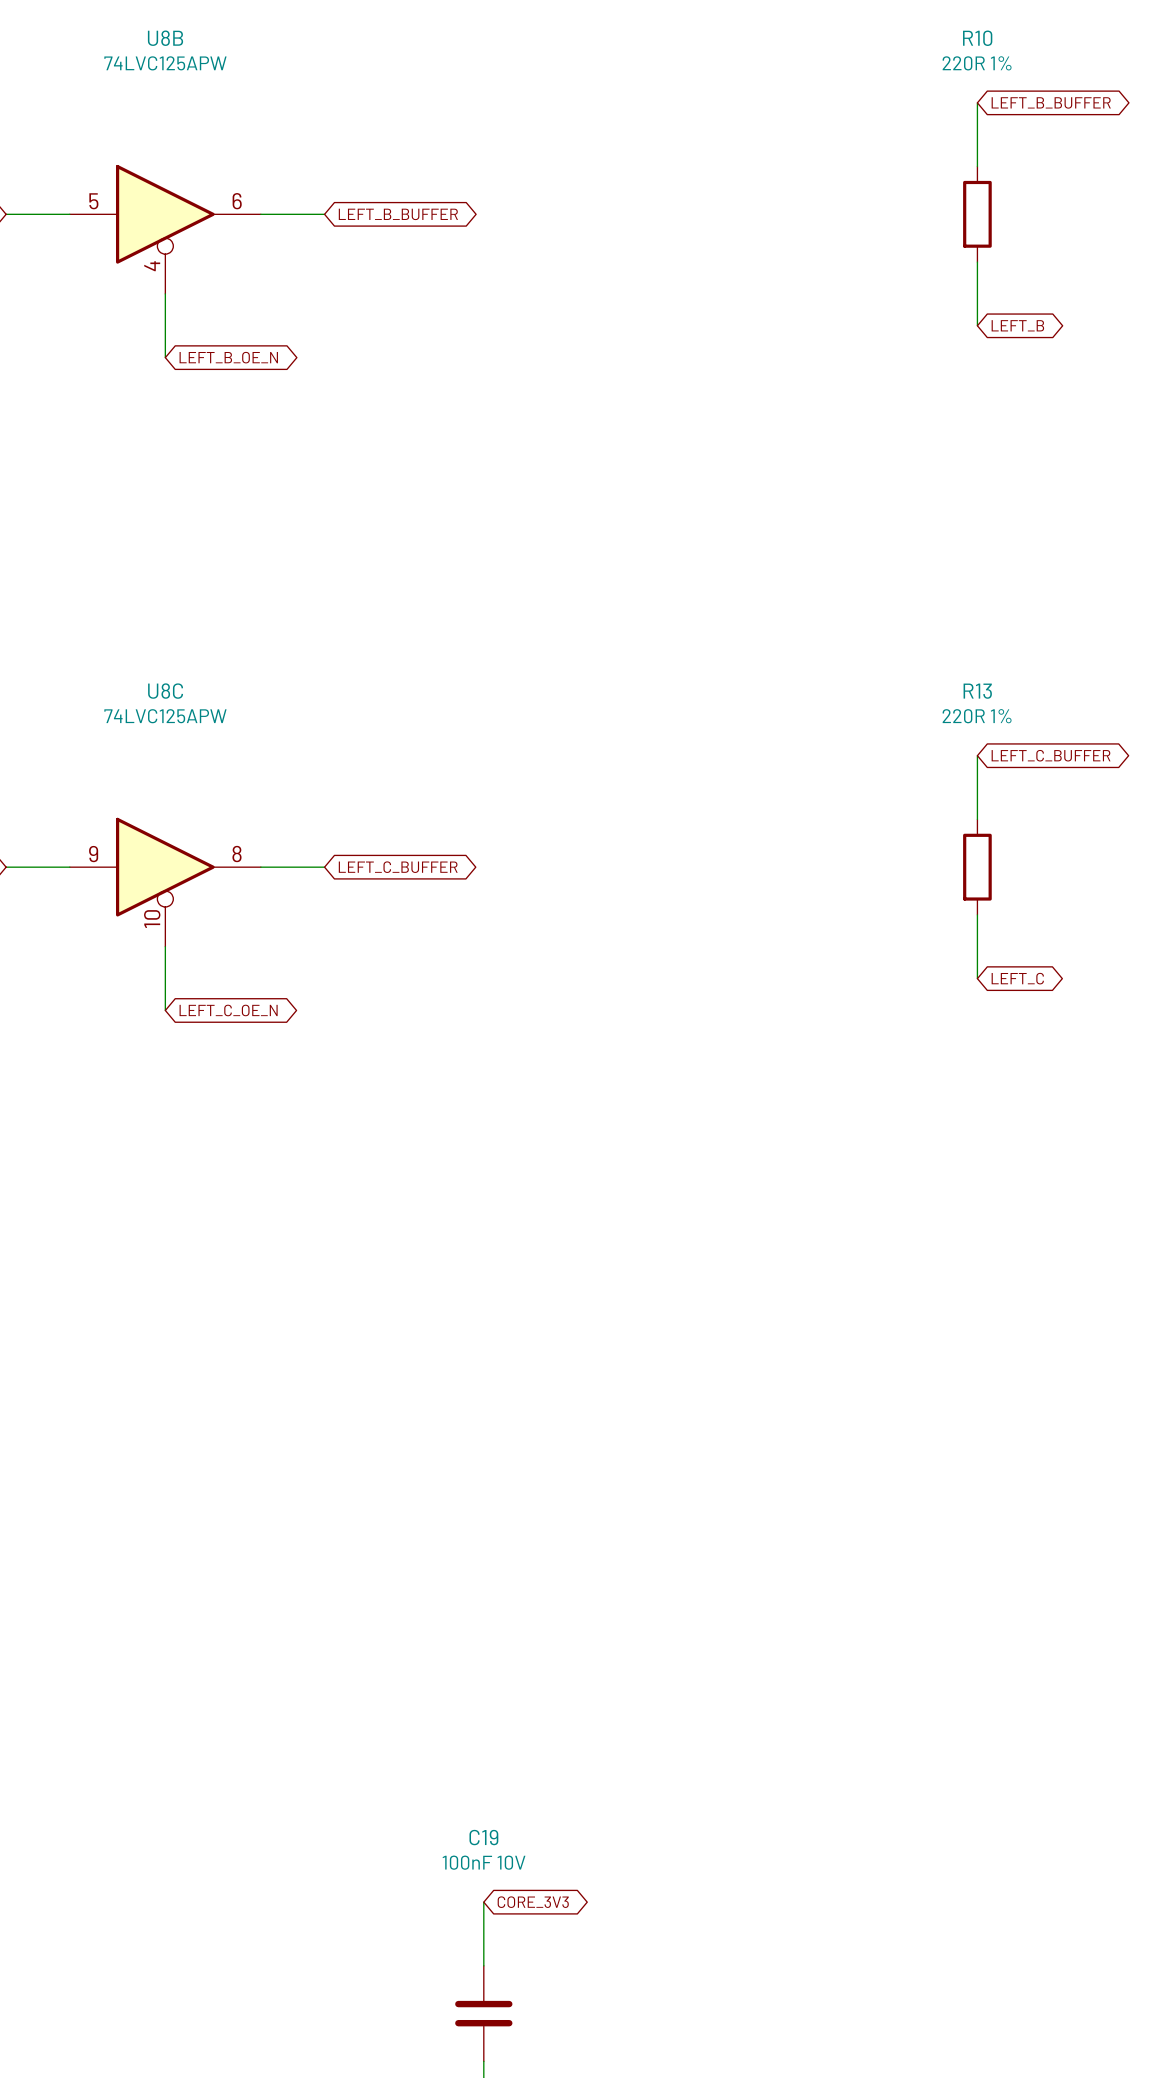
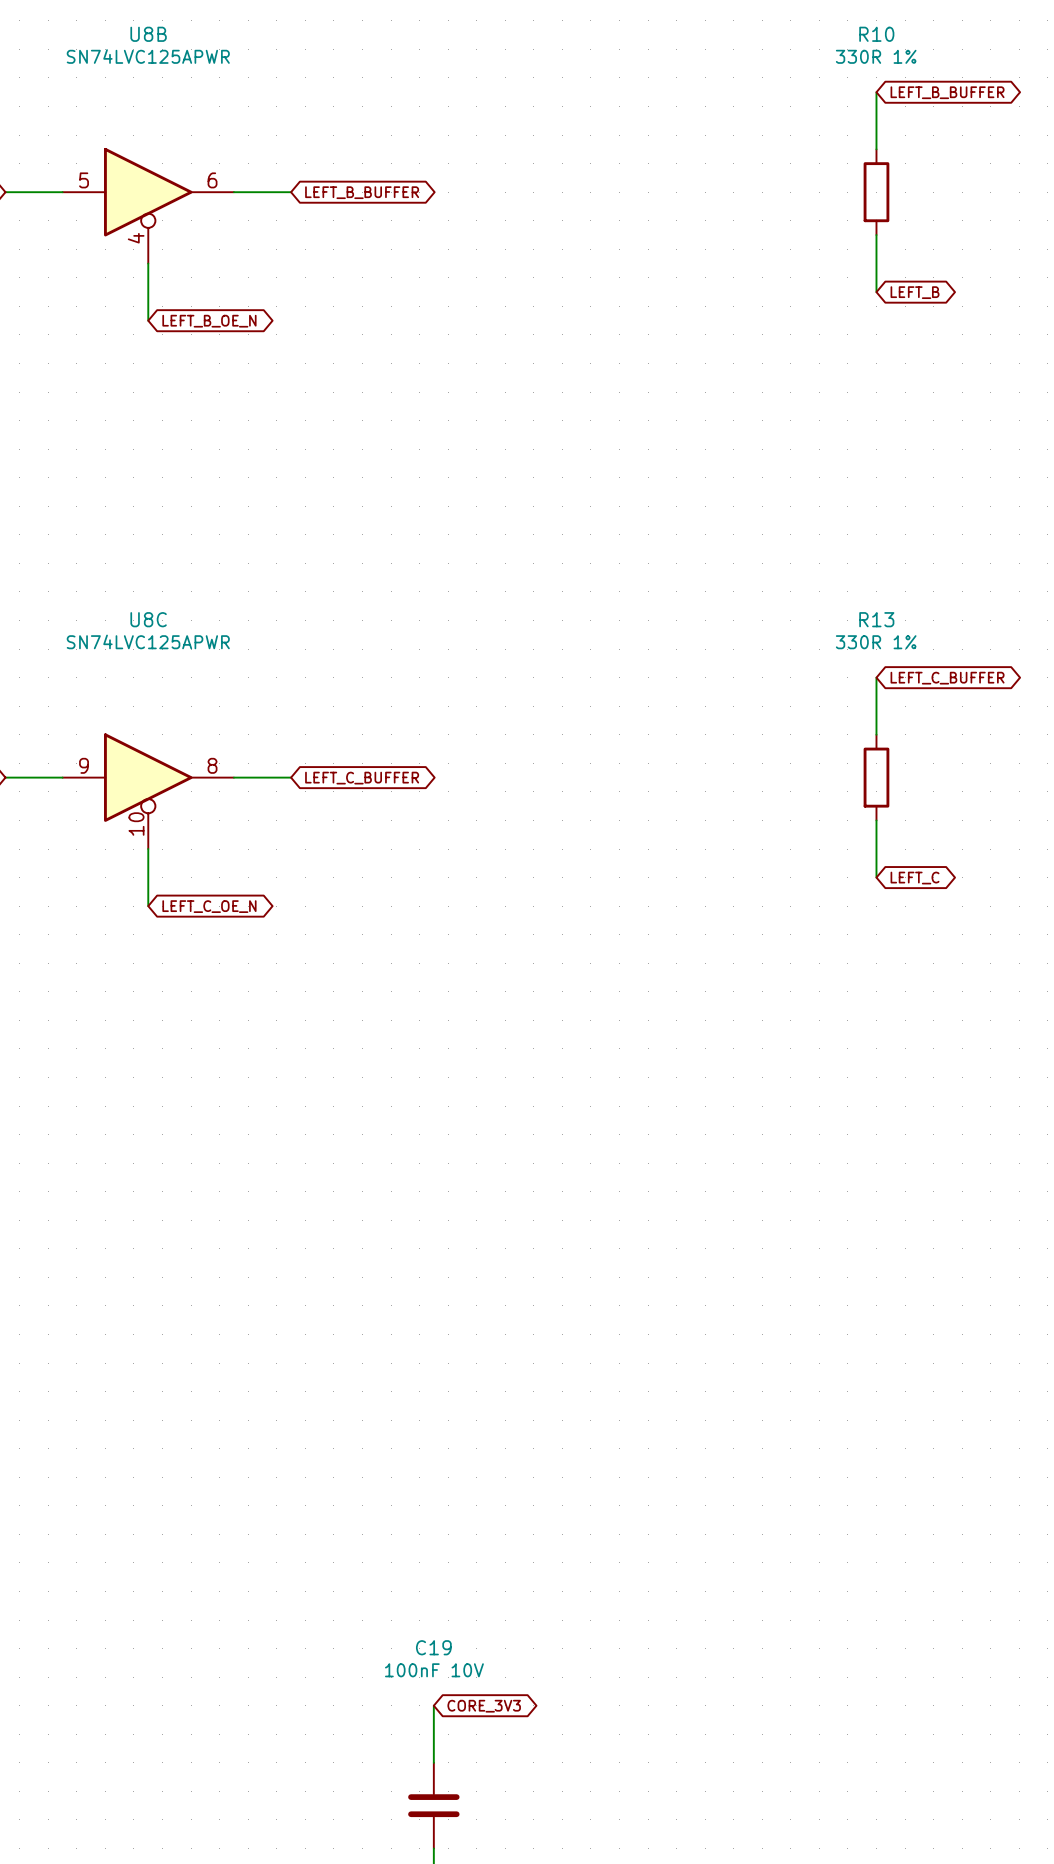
U8B value: 74LVC125APW (165, 63) -> SN74LVC125APWR (148, 56)
R10 value: 220R 1% (977, 63) -> 330R 1% (876, 56)
U8C value: 74LVC125APW (165, 716) -> SN74LVC125APWR (148, 641)
R13 value: 220R 1% (977, 716) -> 330R 1% (876, 642)

